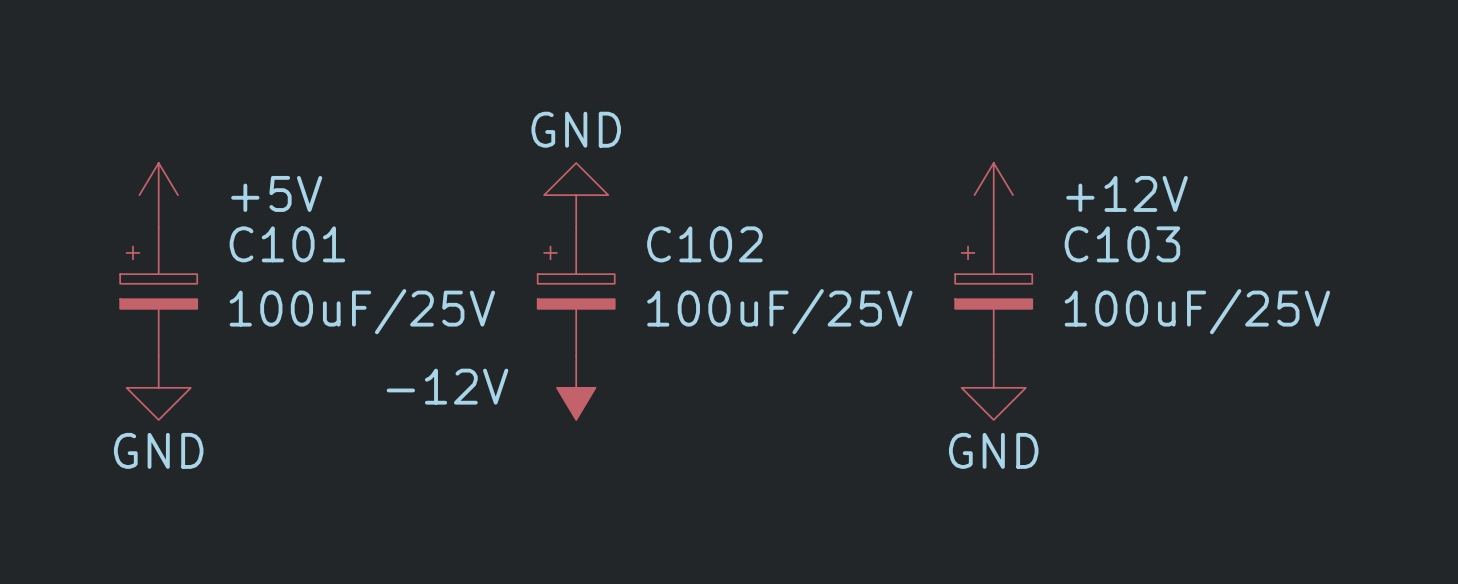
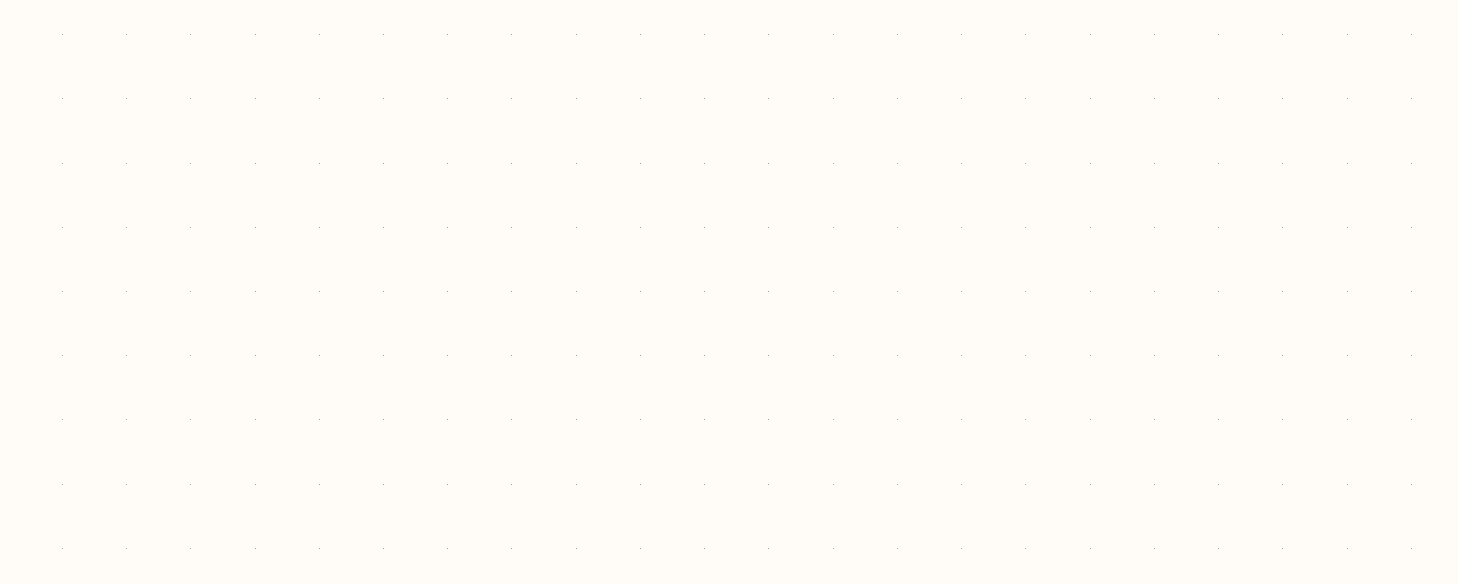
power symbol: +5V (158, 195) -> none
power symbol: GND (576, 195) -> none
power symbol: +12V (993, 195) -> none
C101: 100uF/25V (158, 291) -> none
C102: 100uF/25V (576, 291) -> none
C103: 100uF/25V (993, 291) -> none
power symbol: GND (158, 387) -> none
power symbol: -12V (576, 387) -> none
power symbol: GND (993, 387) -> none

